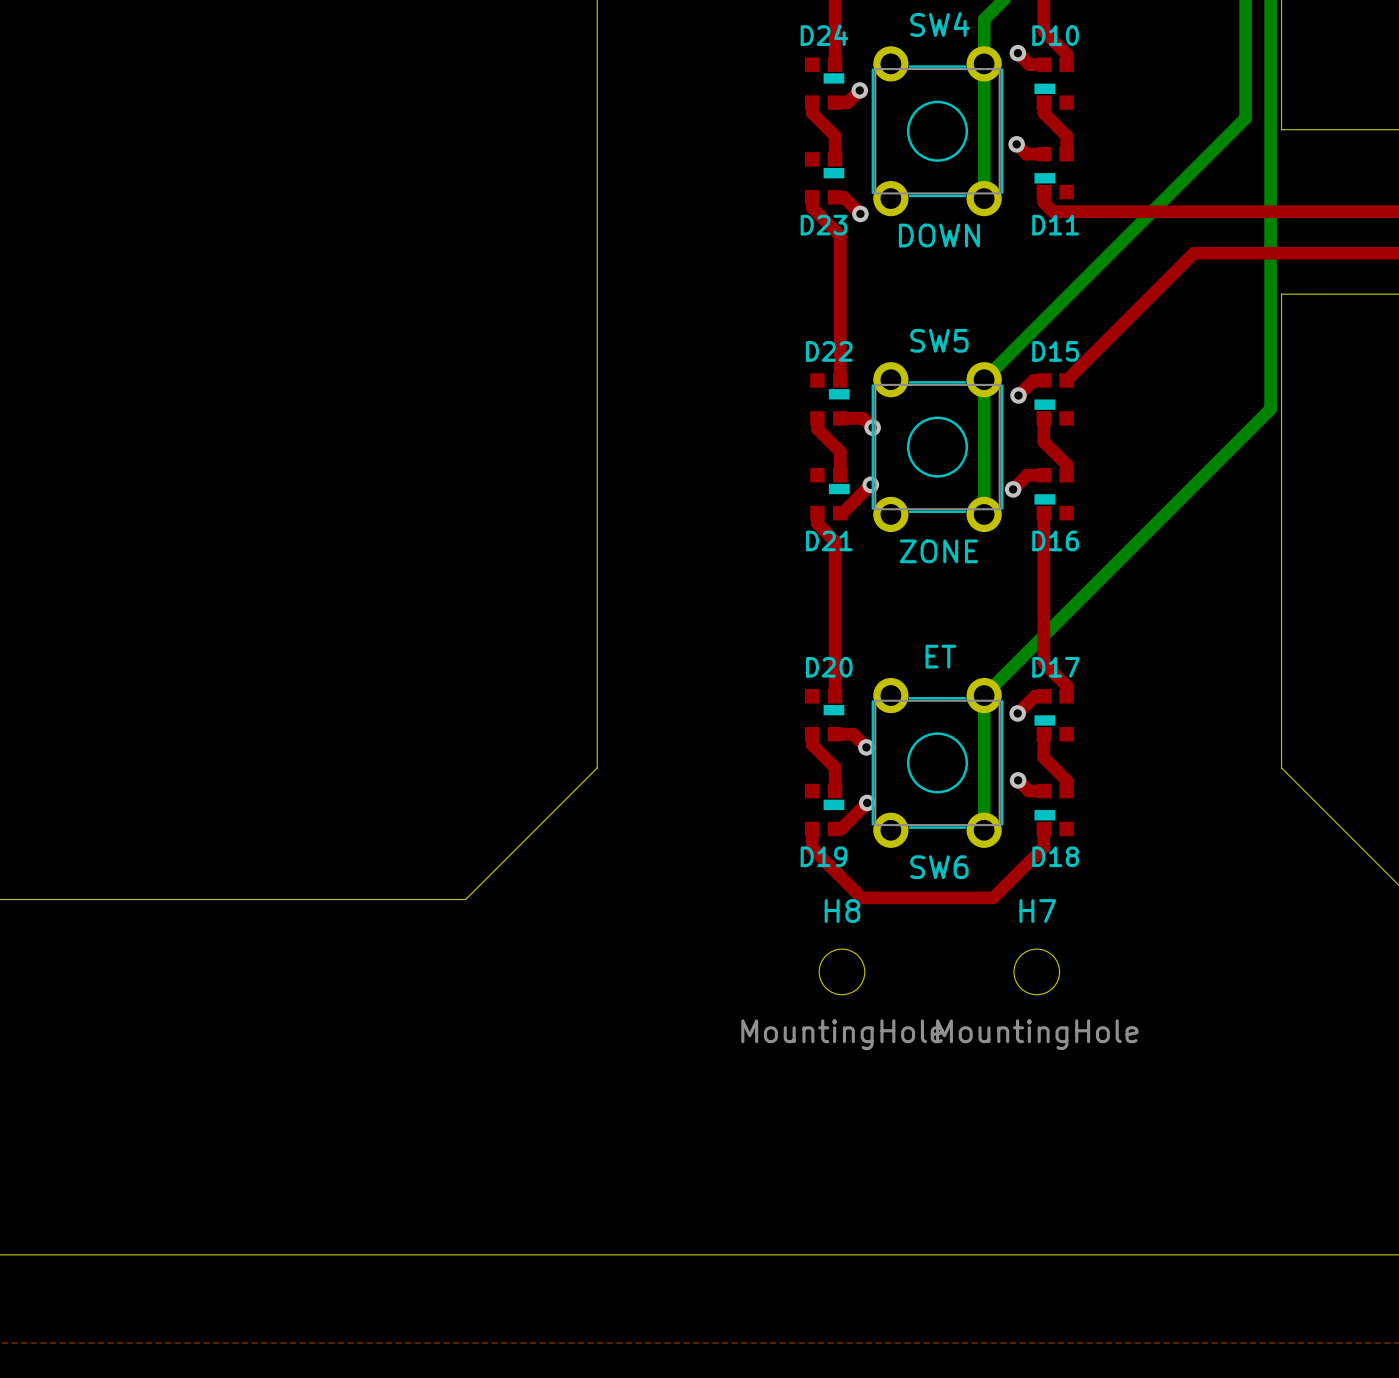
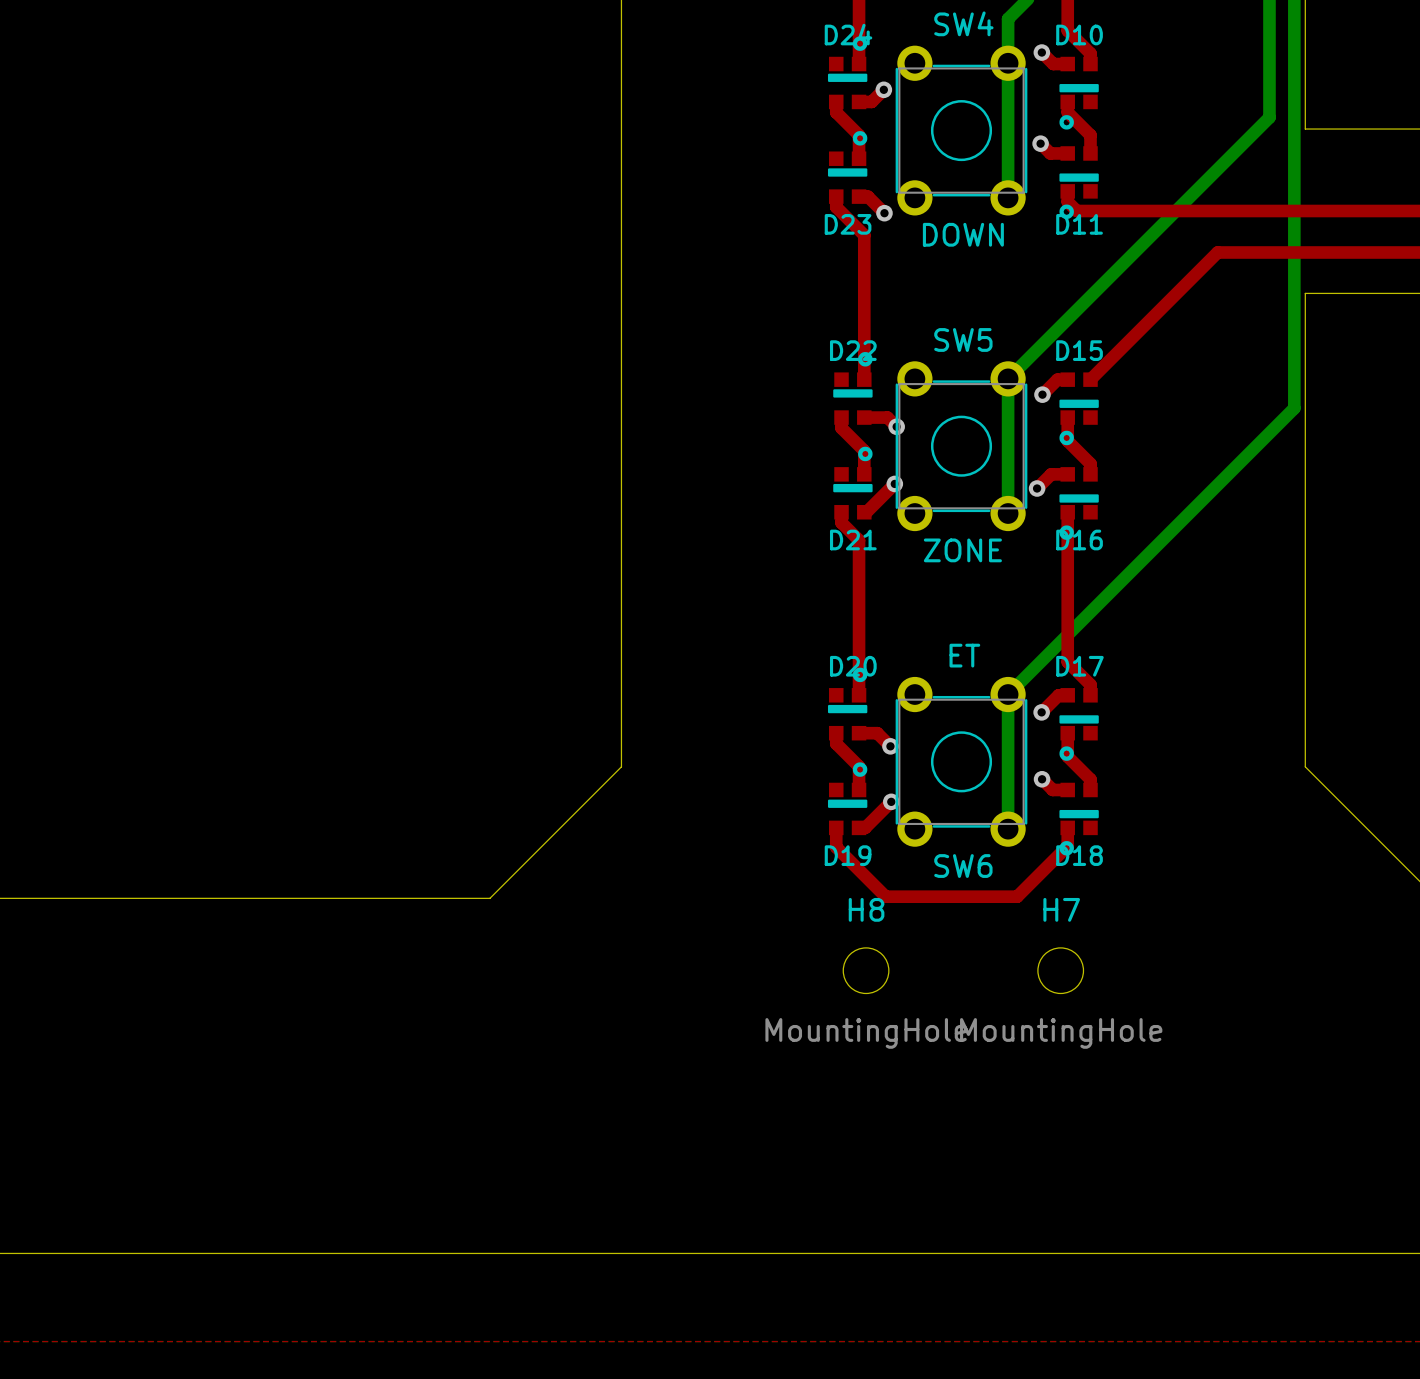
D24 footprint: [804, 57, 845, 110] -> [827, 36, 868, 110]
D10 footprint: [1034, 57, 1074, 110] -> [1059, 56, 1099, 130]
D11 footprint: [1034, 146, 1074, 200] -> [1059, 146, 1099, 220]
D23 footprint: [804, 152, 845, 205] -> [827, 131, 868, 204]
D22 footprint: [810, 373, 850, 426] -> [833, 352, 873, 425]
D15 footprint: [1034, 373, 1074, 426] -> [1059, 372, 1099, 446]
D21 footprint: [810, 468, 850, 521] -> [833, 446, 873, 520]
D16 footprint: [1034, 468, 1074, 521] -> [1059, 467, 1099, 540]
D20 footprint: [804, 689, 845, 742] -> [827, 667, 868, 741]
D17 footprint: [1034, 689, 1074, 742] -> [1059, 688, 1099, 761]
D19 footprint: [804, 783, 845, 837] -> [827, 762, 868, 836]
D18 footprint: [1034, 783, 1074, 837] -> [1059, 782, 1099, 856]

